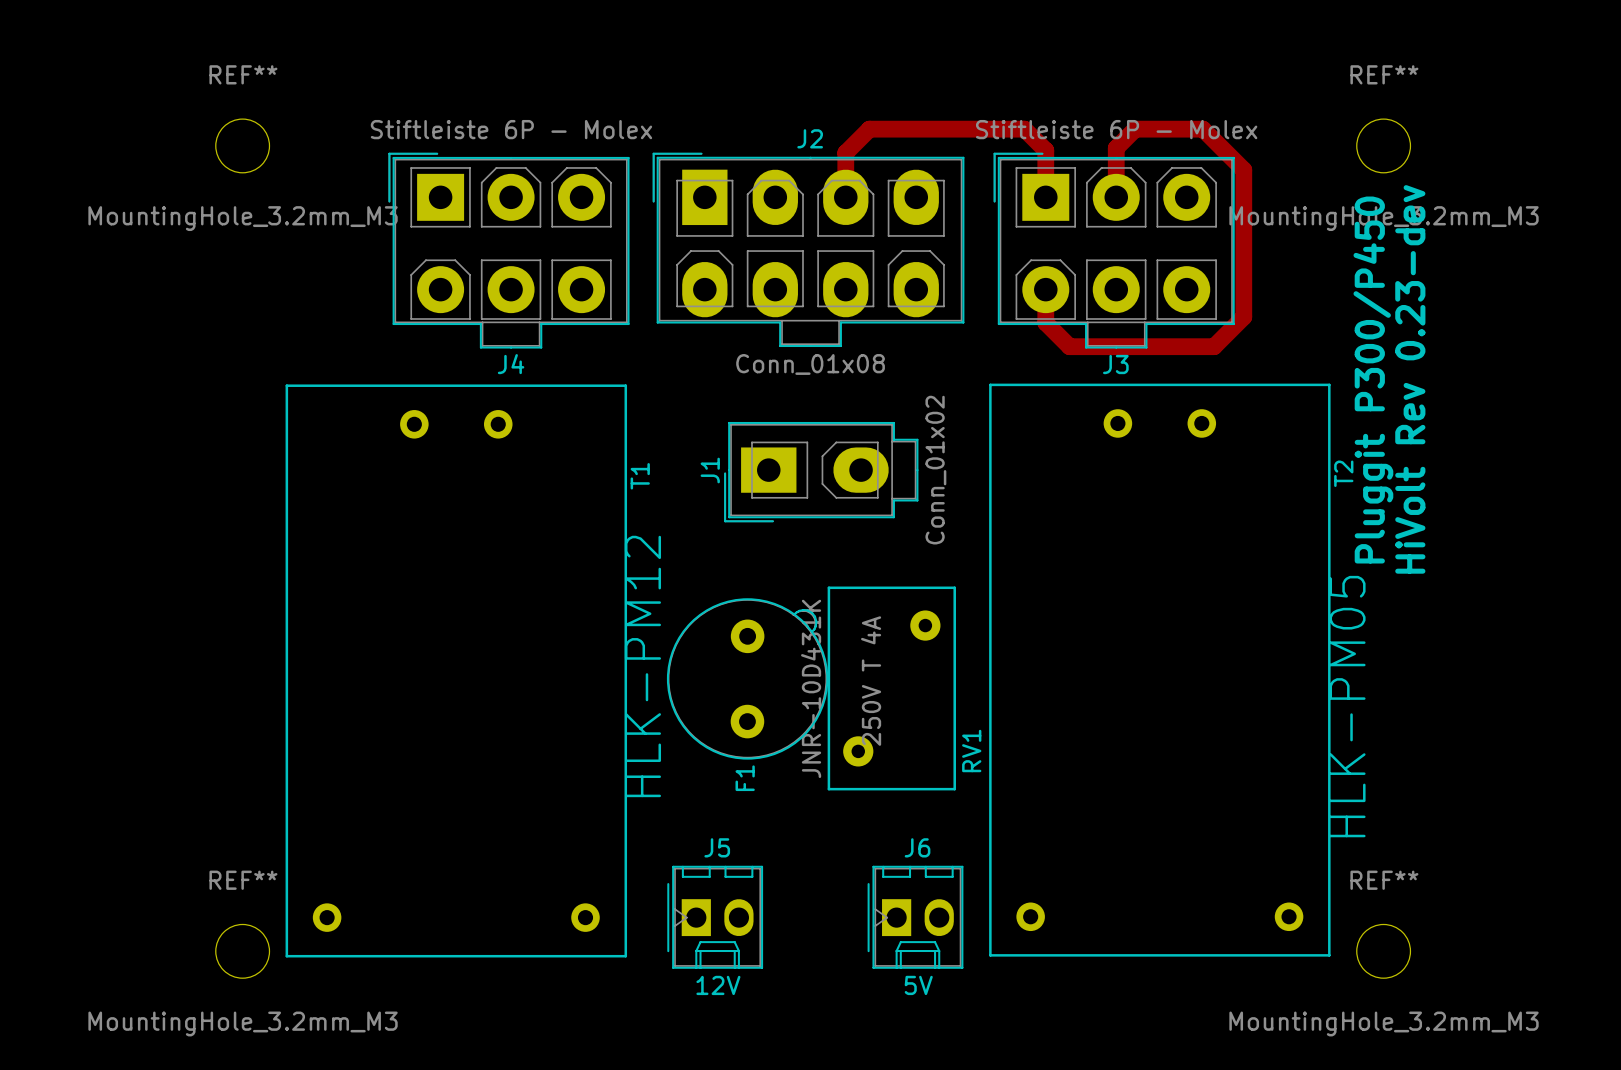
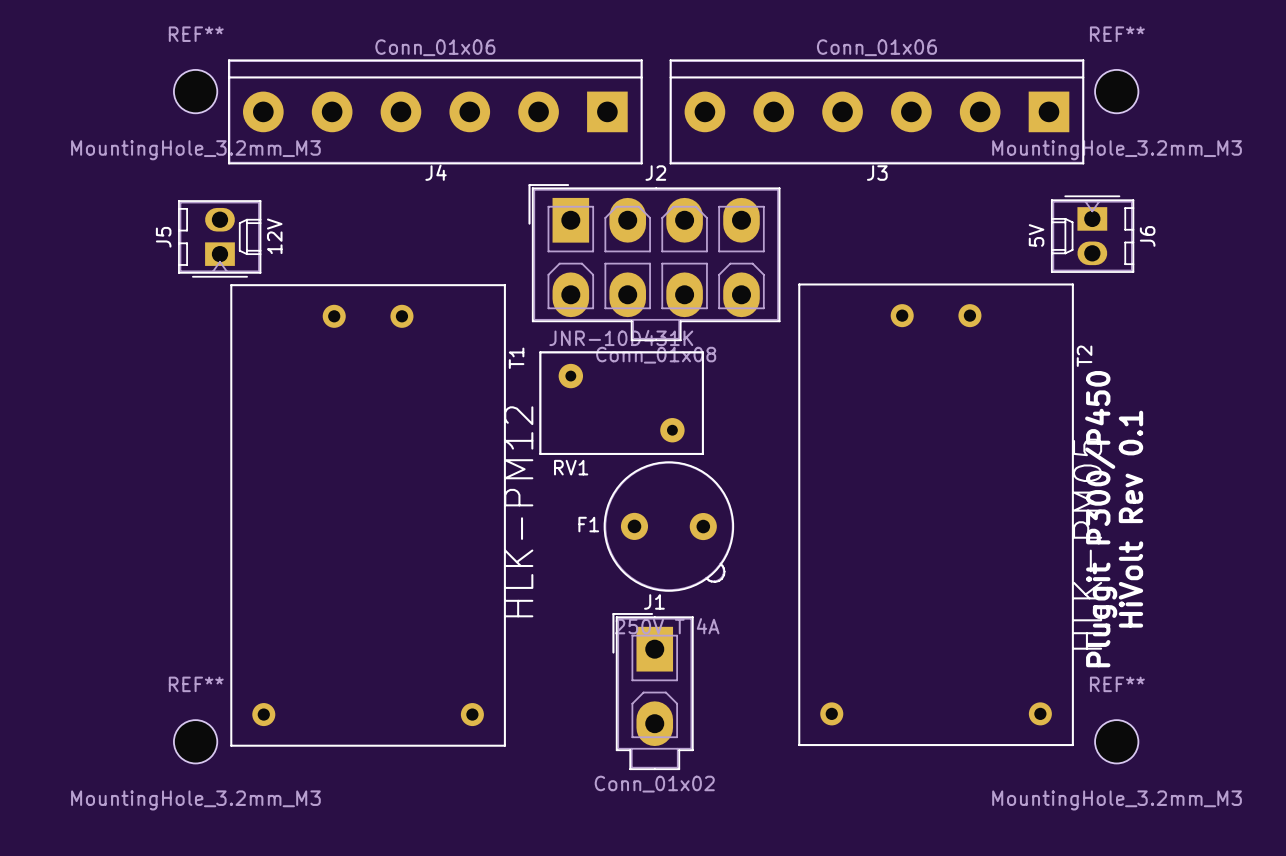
J4 value: Stiftleiste 6P - Molex (511, 129) -> Conn_01x06 (435, 47)
J3 value: Stiftleiste 6P - Molex (1116, 129) -> Conn_01x06 (876, 47)
J4 footprint: [388, 152, 630, 349] -> [228, 59, 643, 165]
J3 footprint: [993, 152, 1235, 349] -> [669, 59, 1085, 165]
track: (845, 197) (845, 152) (869, 129) (1024, 129) (1045, 150) (1045, 197) -> none
track: (1116, 197) (1116, 148) (1135, 129) (1202, 129) (1243, 169) (1243, 317) (1214, 346) (1069, 346) (1045, 322) (1045, 289) -> none
J2 position: (808, 249) -> (654, 262)
J4 name position: J4 (511, 364) -> J4 (436, 172)
J3 name position: J3 (1115, 364) -> J3 (877, 173)
text: HiVolt Rev 0.23-dev (1410, 379) -> HiVolt Rev 0.1 (1130, 519)
text position: Pluggit P300/P450 (1373, 380) -> Pluggit P300/P450 (1101, 519)
J1 rotation: 0° (821, 472) -> 90° clockwise (653, 691)
J1 position: (821, 472) -> (653, 691)
F1 rotation: 0° (747, 678) -> 90° clockwise (668, 526)
RV1 rotation: 0° (891, 688) -> 90° clockwise (621, 403)
RV1 position: (891, 688) -> (621, 403)
J5 rotation: 0° (715, 917) -> 90° counterclockwise (219, 238)
J5 position: (715, 917) -> (219, 238)
J6 rotation: 0° (915, 917) -> 90° clockwise (1092, 234)
J6 position: (915, 917) -> (1092, 234)

